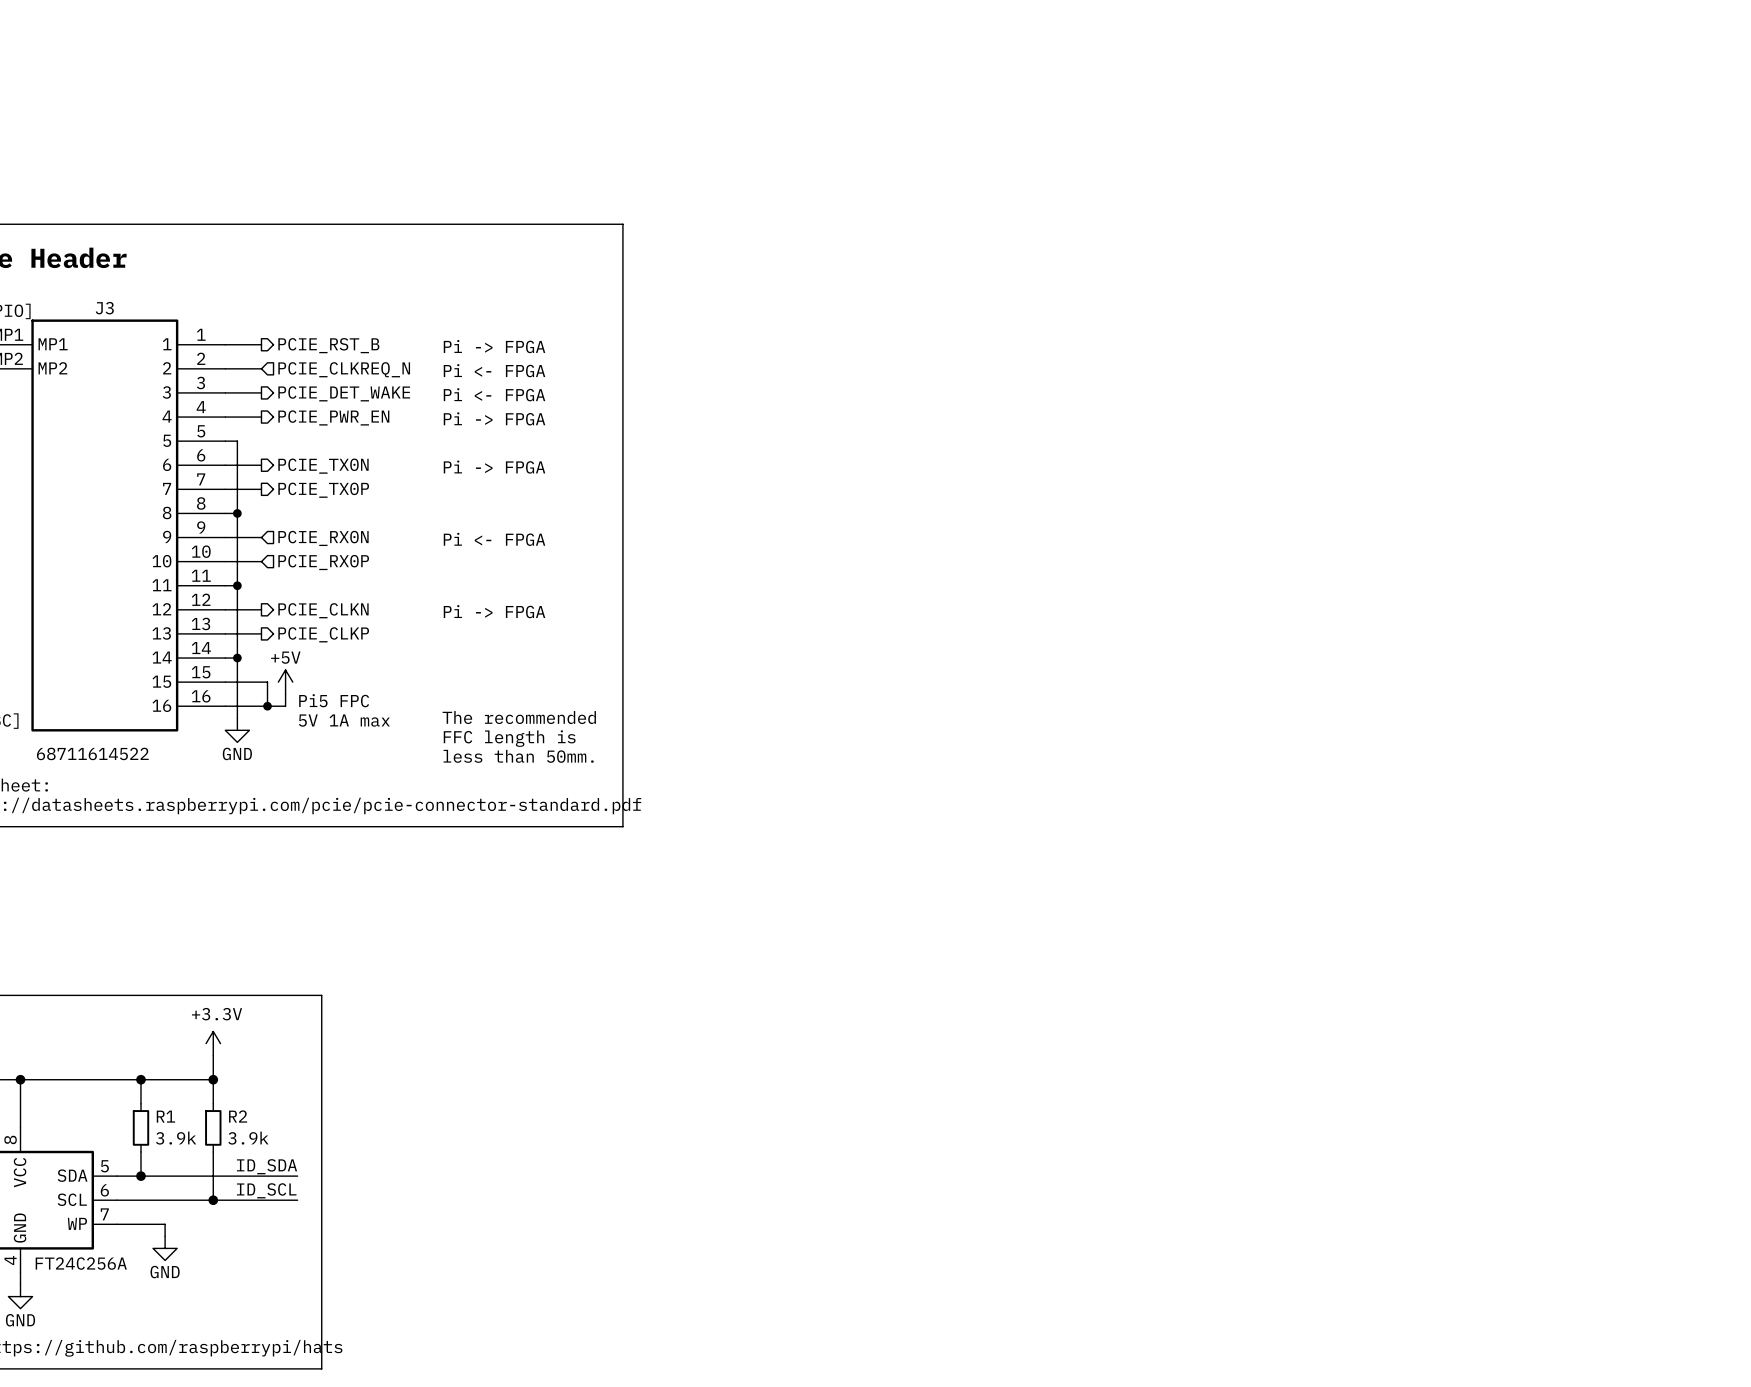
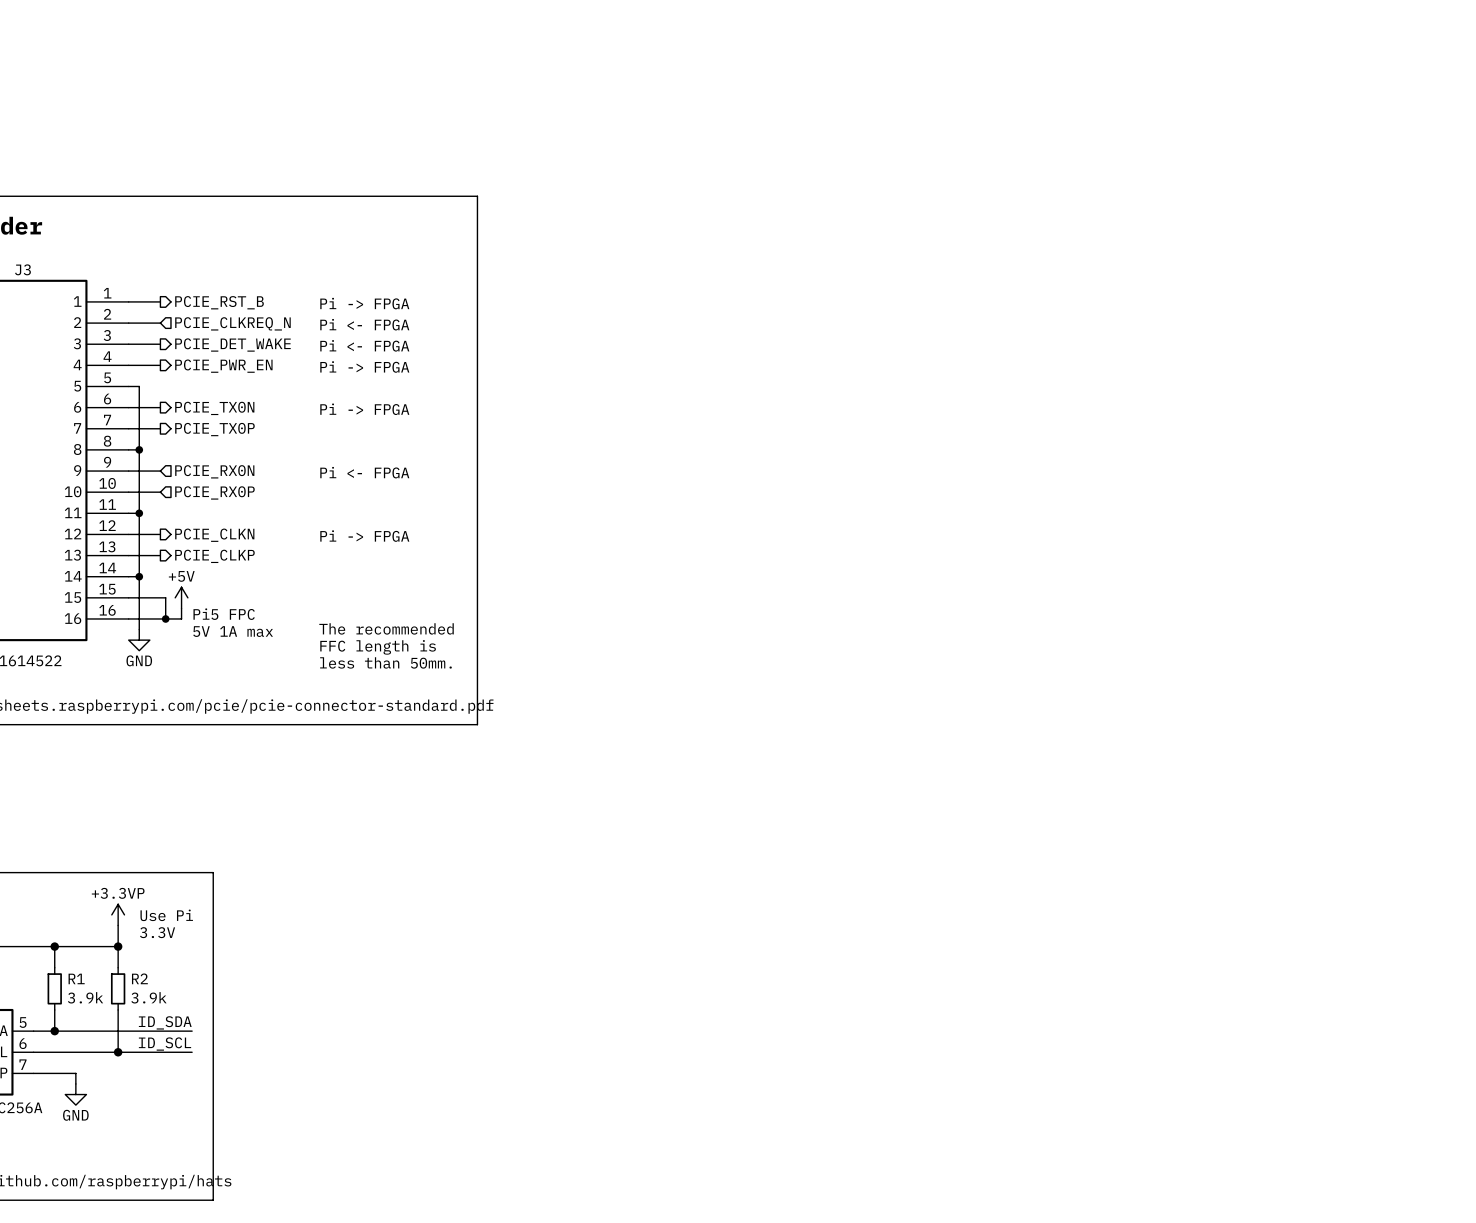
power symbol: +3.3V (213, 1043) -> +3.3VP (118, 914)
text: none -> Use Pi (166, 915)
text: none -> 3.3V (157, 932)

